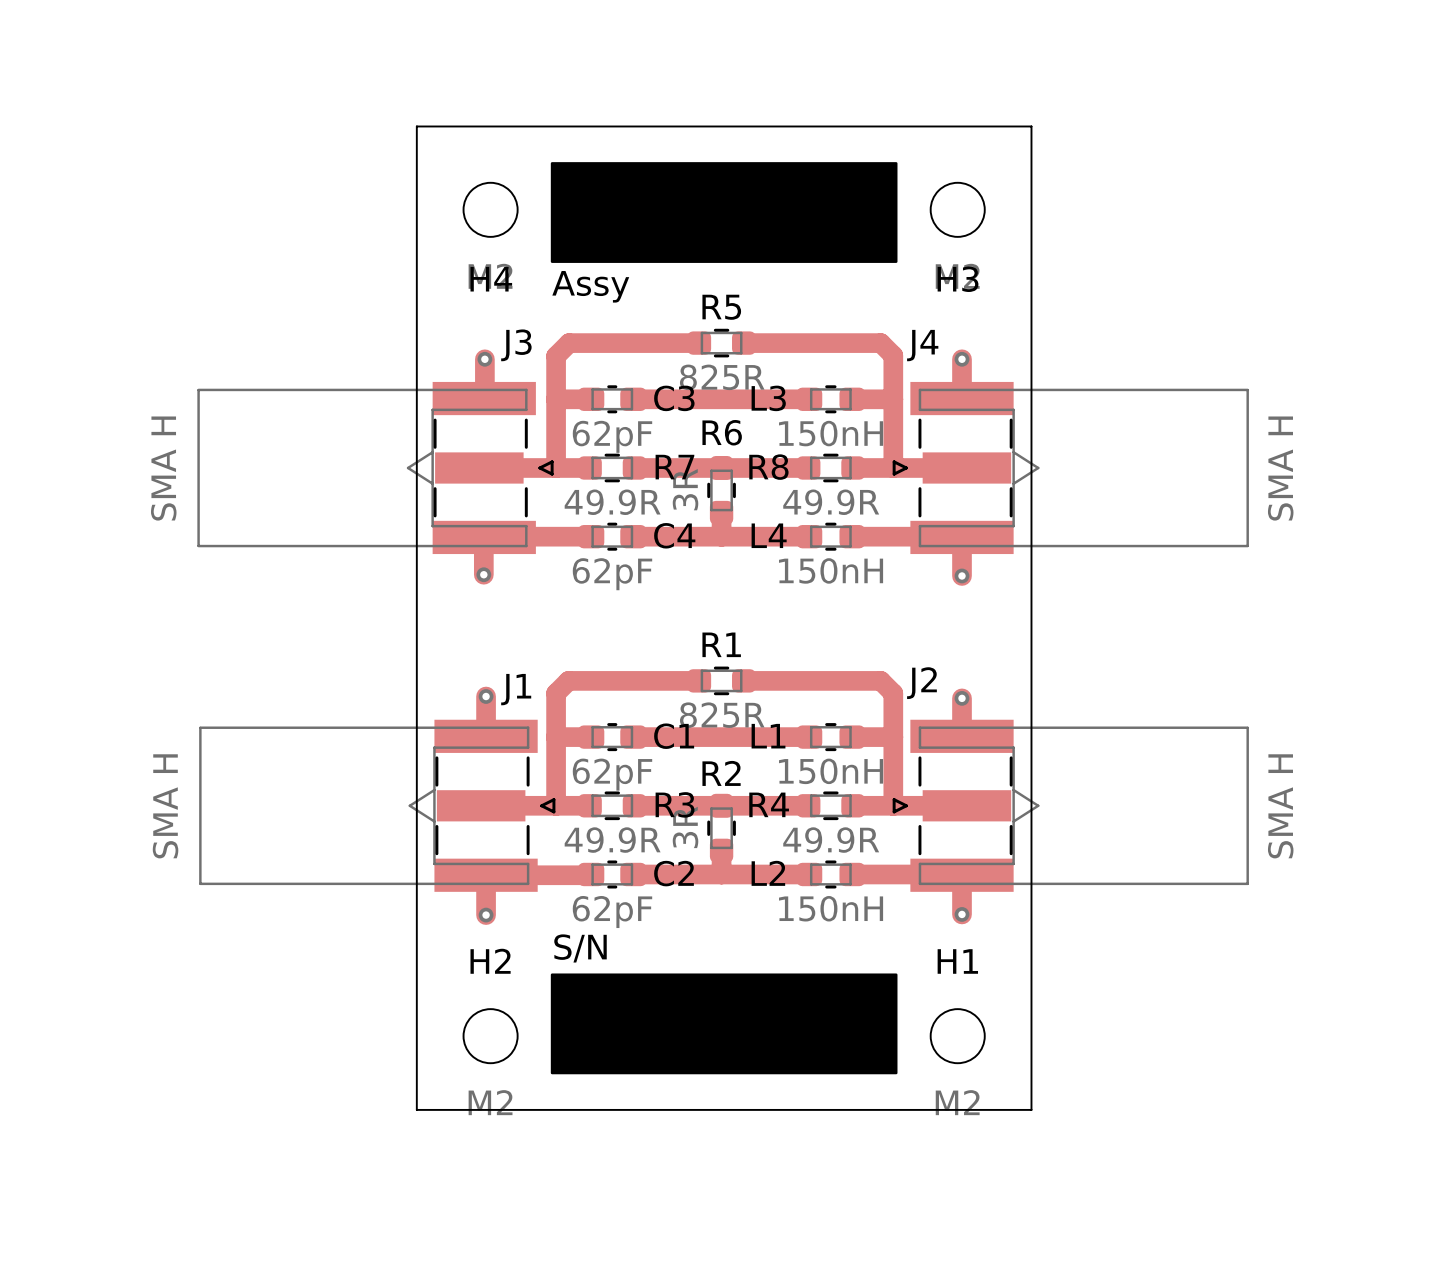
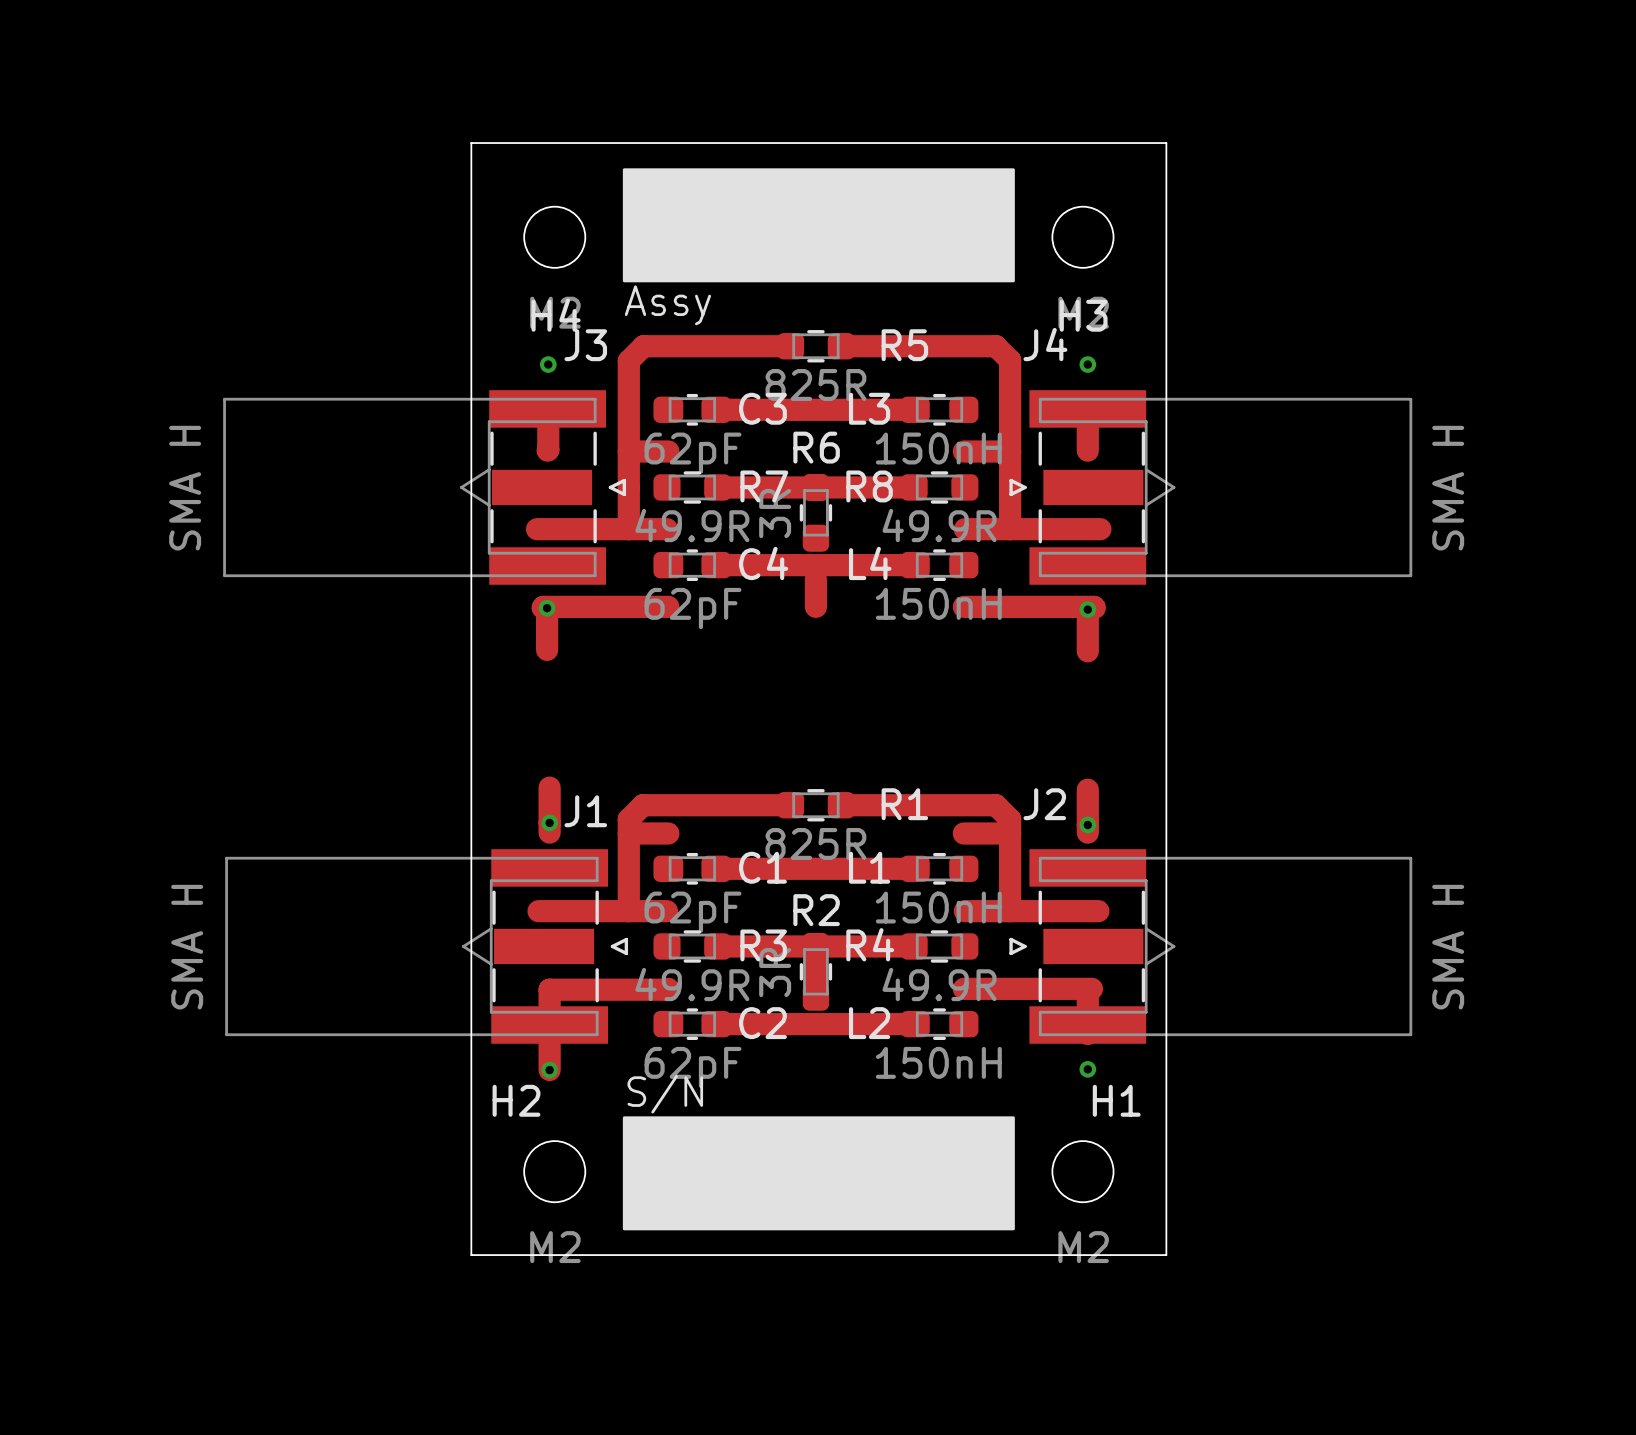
drawing position: (724, 212) -> (818, 225)
text position: Assy (590, 286) -> Assy (667, 305)
R5 name position: R5 (721, 307) -> R5 (904, 345)
track: (699, 343) (569, 343) (556, 356) -> (791, 346) (643, 346) (628, 361) (628, 402)
R5 position: (721, 343) -> (815, 346)
track: (744, 343) (880, 343) (893, 355) -> (841, 346) (996, 346) (1010, 360) (1010, 402)
via position: (484, 359) -> (548, 364)
via position: (962, 359) -> (1087, 364)
C3 position: (612, 399) -> (692, 409)
track: (633, 399) (809, 399) -> (716, 409) (915, 409)
L3 position: (830, 399) -> (939, 409)
J3 position: (375, 467) -> (424, 487)
R7 position: (612, 467) -> (692, 487)
track: (634, 467) (808, 467) -> (717, 487) (914, 487)
R8 position: (830, 467) -> (939, 487)
J4 position: (1070, 467) -> (1210, 487)
R6 position: (721, 490) -> (815, 512)
C4 position: (612, 536) -> (692, 565)
track: (633, 536) (809, 536) -> (716, 565) (915, 565)
L4 position: (830, 536) -> (939, 565)
via position: (483, 574) -> (547, 608)
via position: (962, 575) -> (1087, 609)
R1 name position: R1 (721, 644) -> R1 (904, 804)
track: (699, 680) (568, 680) (556, 693) (556, 724) -> (790, 805) (642, 805) (628, 819)
R1 position: (721, 680) -> (815, 805)
track: (744, 680) (880, 680) (893, 693) (893, 724) -> (841, 805) (996, 805) (1010, 819)
via position: (486, 696) -> (549, 822)
via position: (962, 698) -> (1087, 825)
C1 position: (612, 737) -> (692, 868)
track: (633, 737) (809, 737) -> (716, 868) (915, 868)
L1 position: (830, 737) -> (939, 868)
J1 position: (377, 805) -> (426, 946)
R3 position: (612, 805) -> (692, 946)
track: (634, 805) (808, 805) -> (717, 946) (914, 946)
R4 position: (830, 805) -> (939, 946)
J2 position: (1070, 805) -> (1210, 946)
R2 position: (721, 828) -> (815, 971)
C2 position: (612, 874) -> (692, 1024)
track: (633, 874) (809, 874) -> (716, 1024) (915, 1024)
L2 position: (830, 874) -> (939, 1024)
via position: (962, 914) -> (1087, 1069)
track: none -> (549, 1034) (549, 1070)
via position: (486, 915) -> (549, 1070)
text position: S/N (580, 948) -> S/N (665, 1094)
H2 name position: H2 (490, 961) -> H2 (516, 1100)
H1 name position: H1 (957, 961) -> H1 (1116, 1100)
drawing position: (724, 1023) -> (818, 1173)

